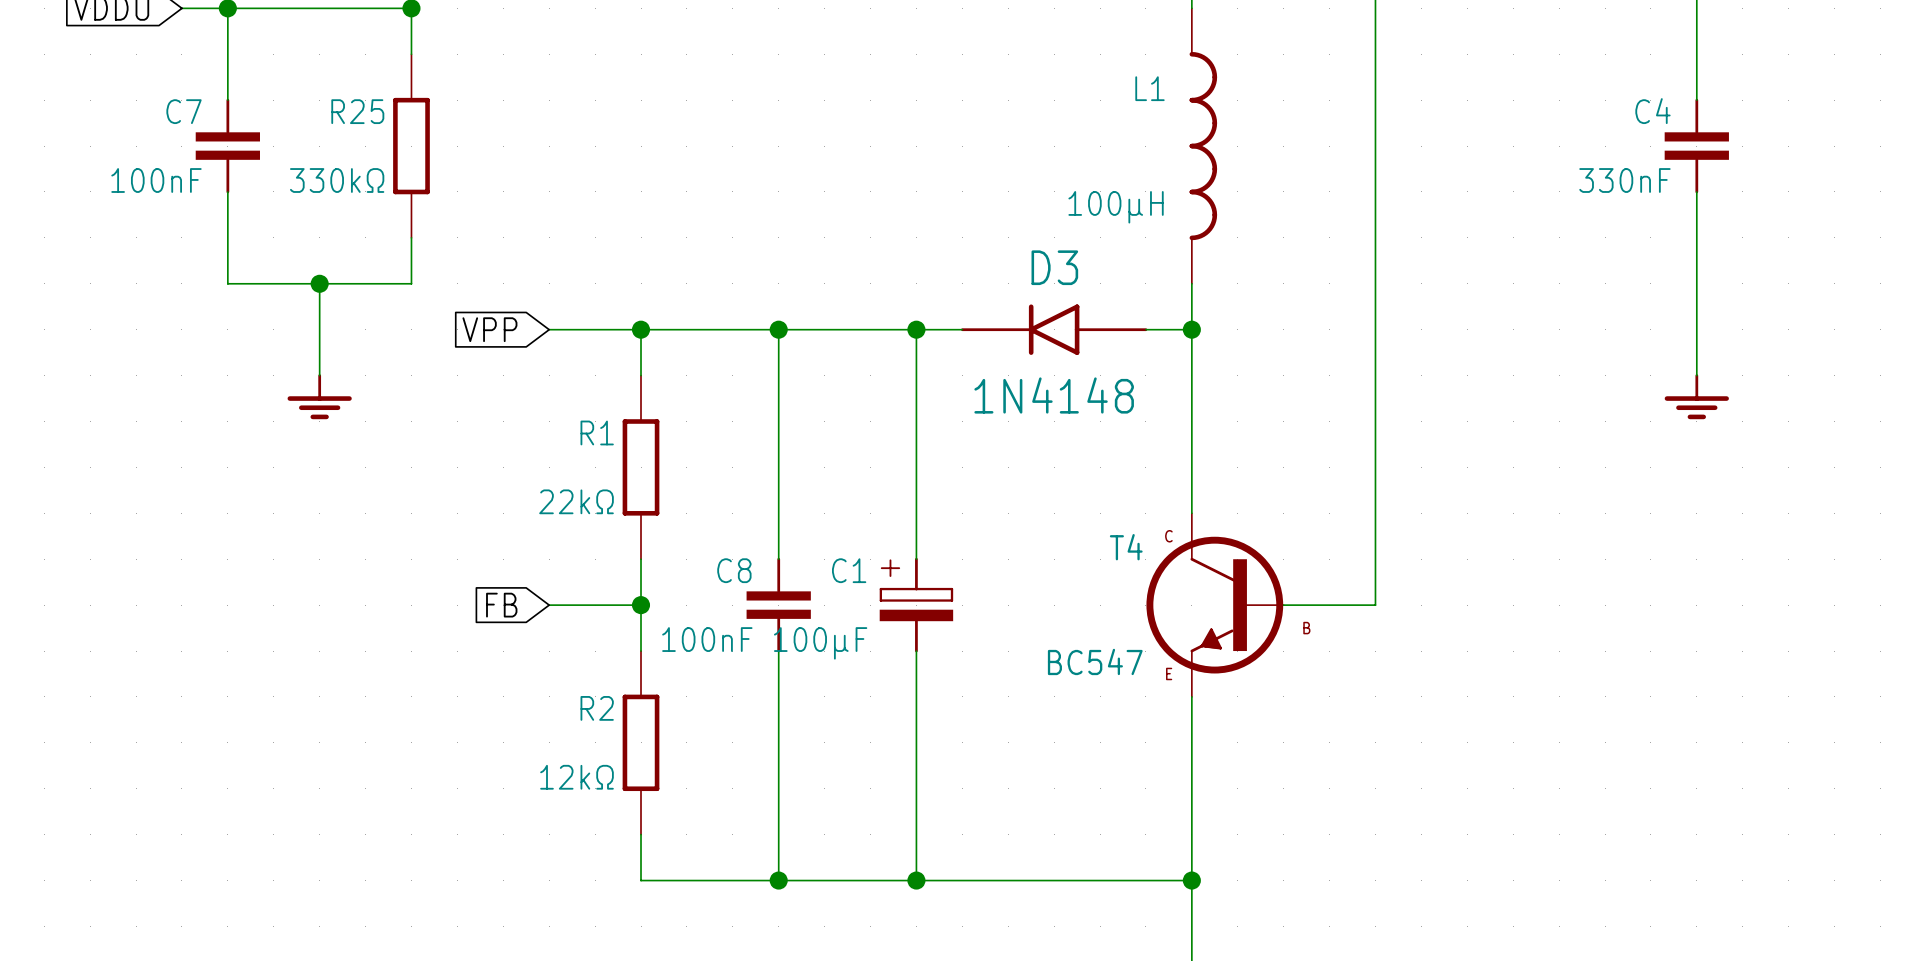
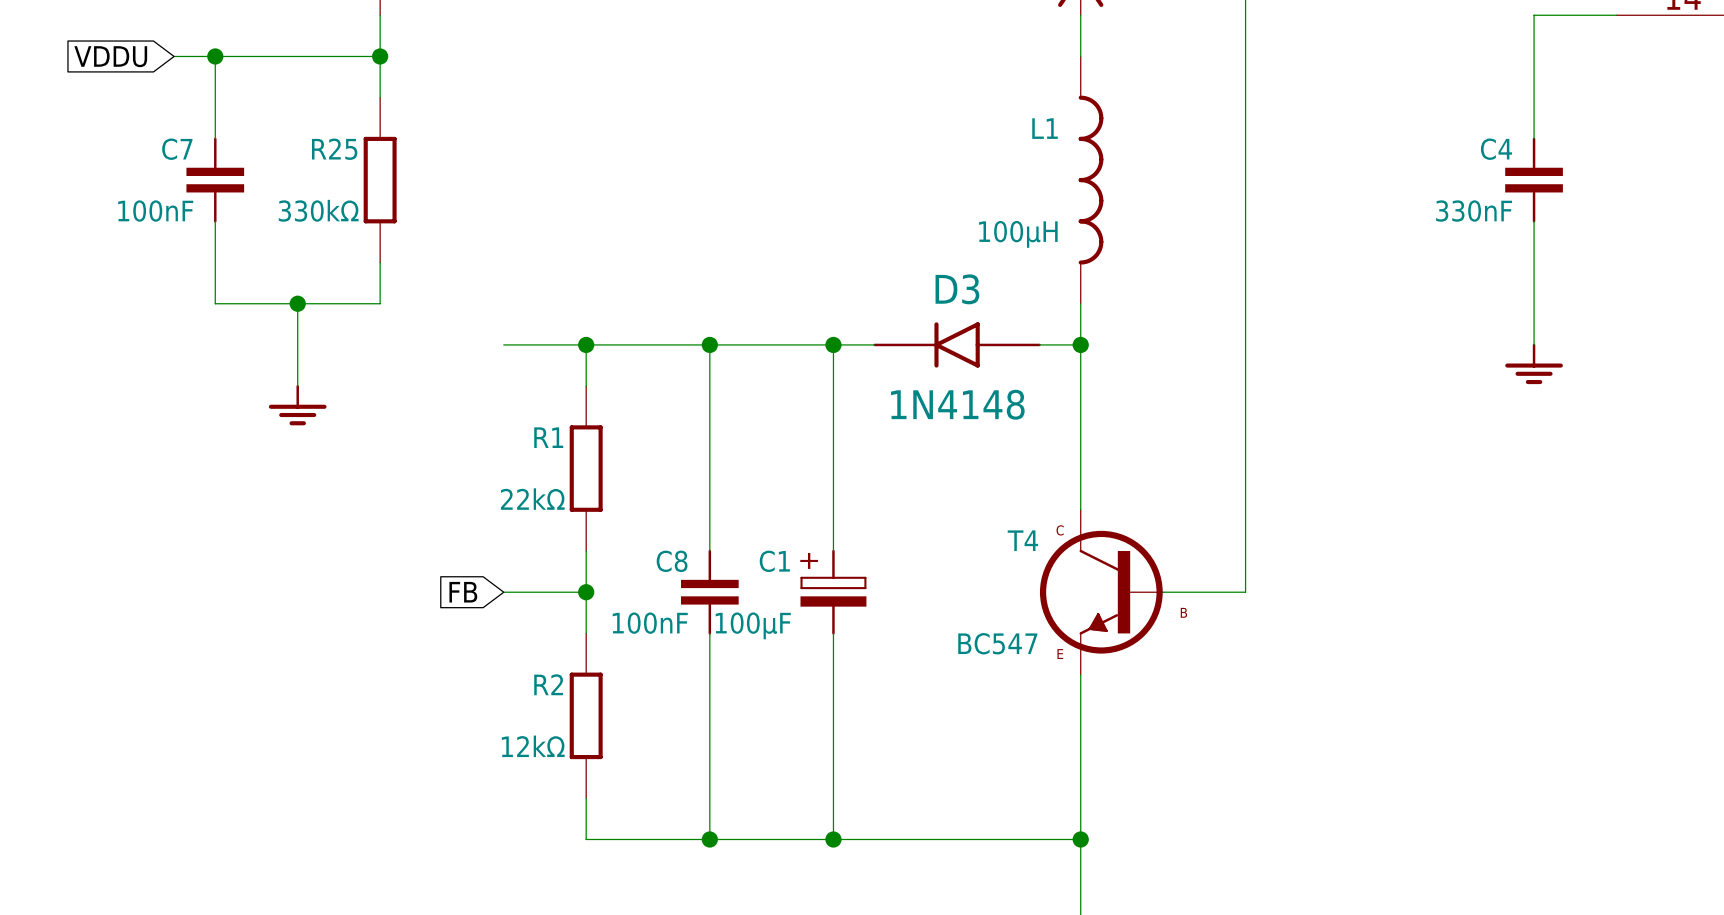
global label: VPP (489, 329) -> none
power symbol position: (1696, 396) -> (1534, 363)

